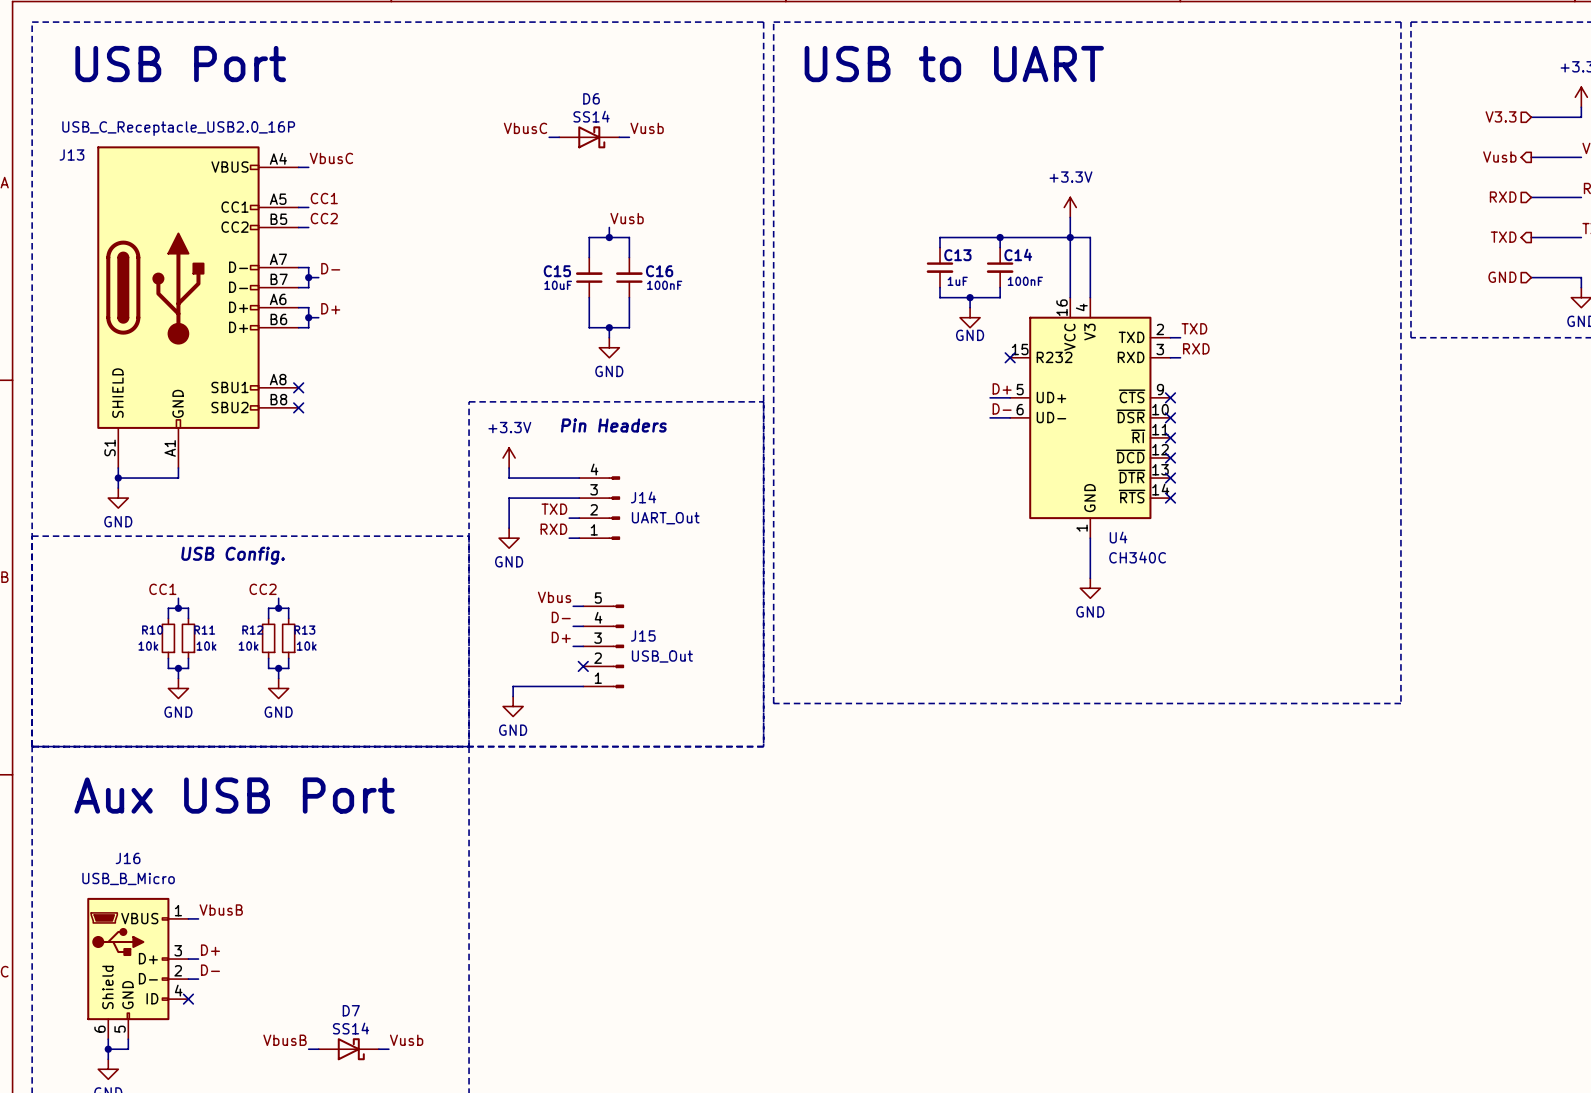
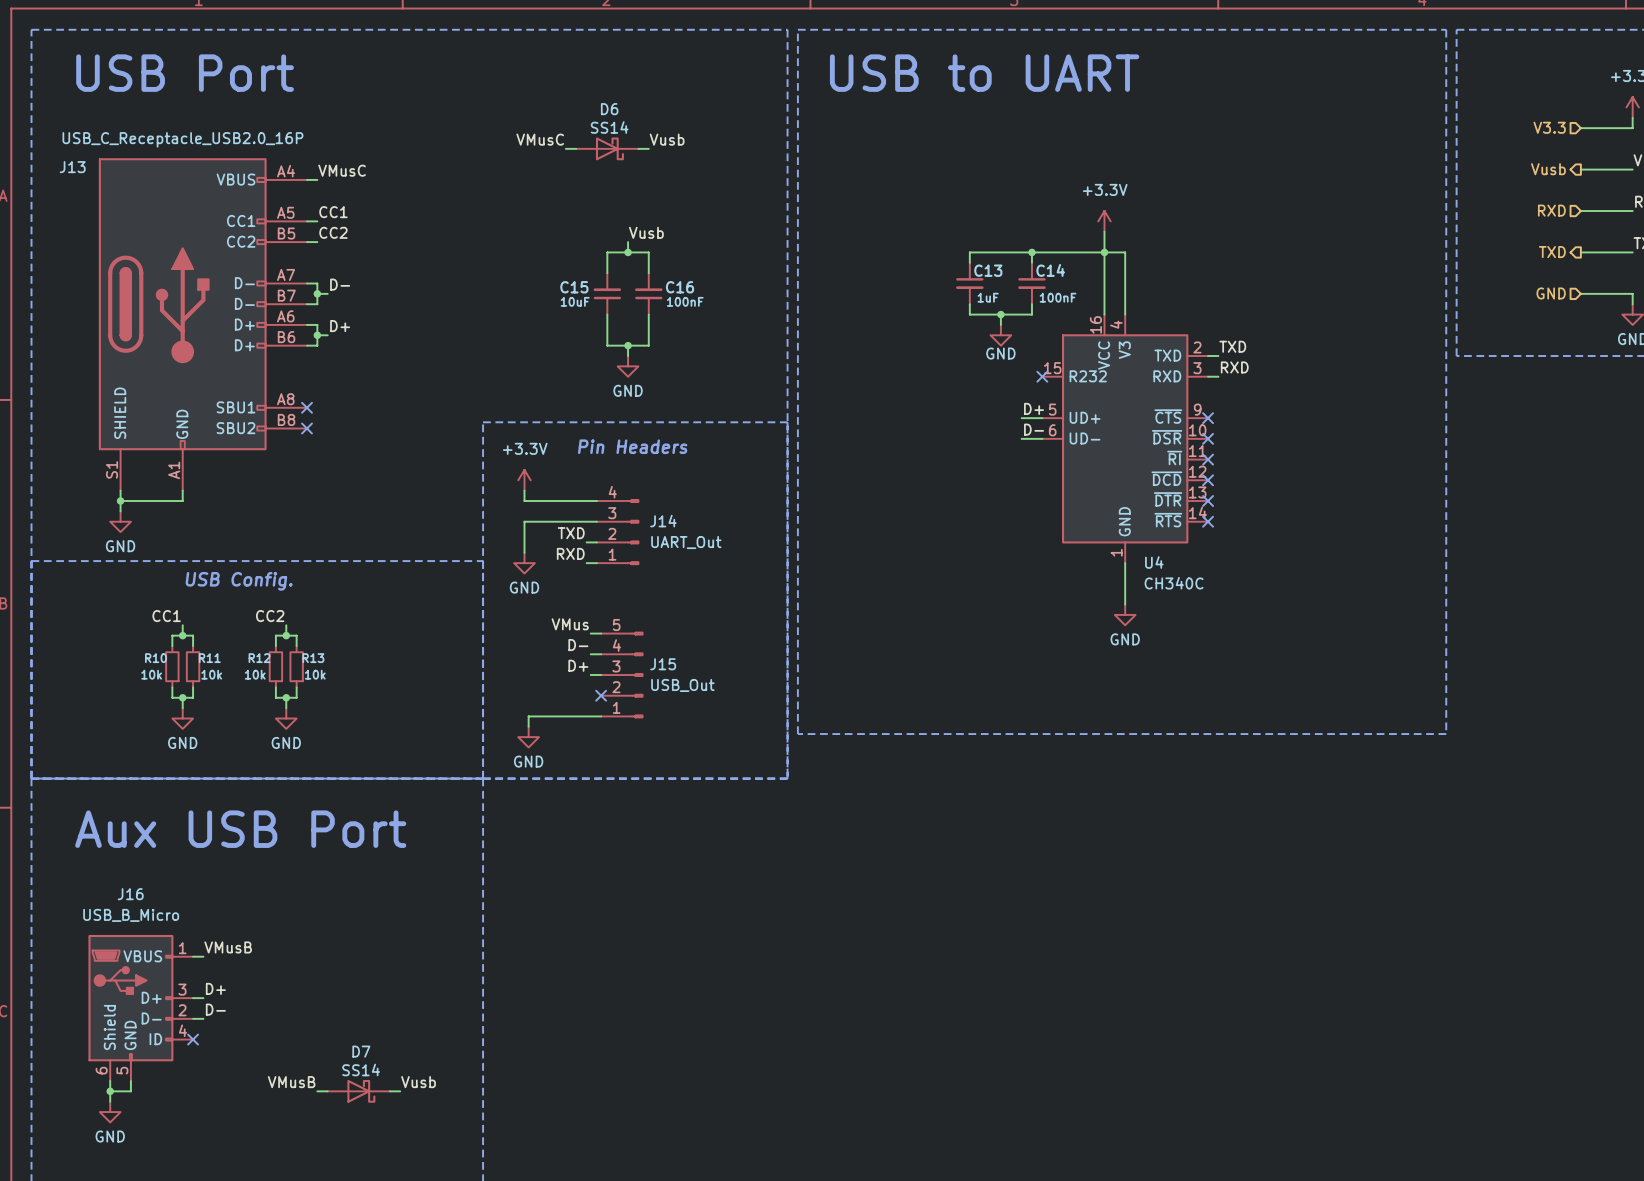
label: VbusC (525, 128) -> VMusC (540, 139)
label: VbusC (331, 158) -> VMusC (342, 170)
label: Vbus (554, 597) -> VMus (570, 624)
label: VbusB (221, 910) -> VMusB (228, 947)
label: VbusB (285, 1040) -> VMusB (291, 1082)

